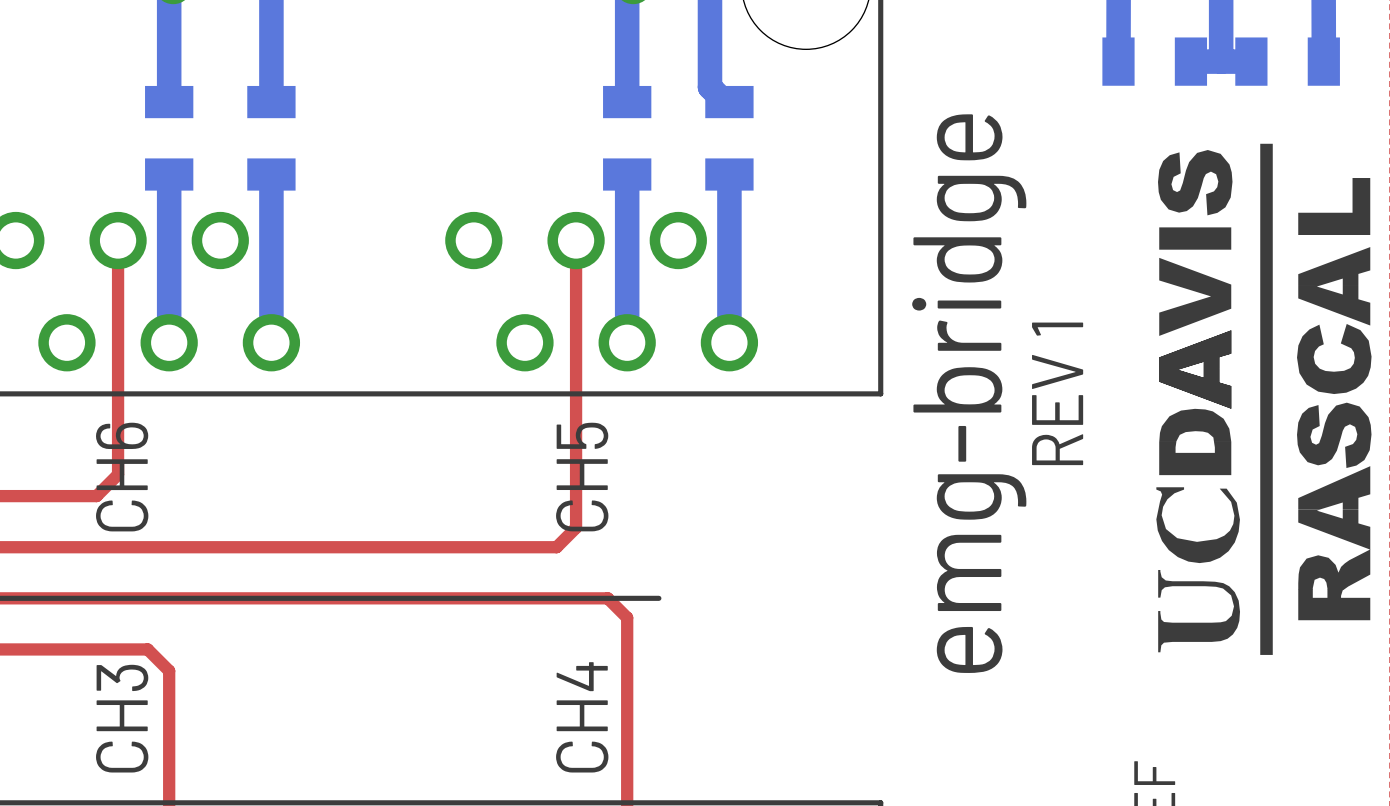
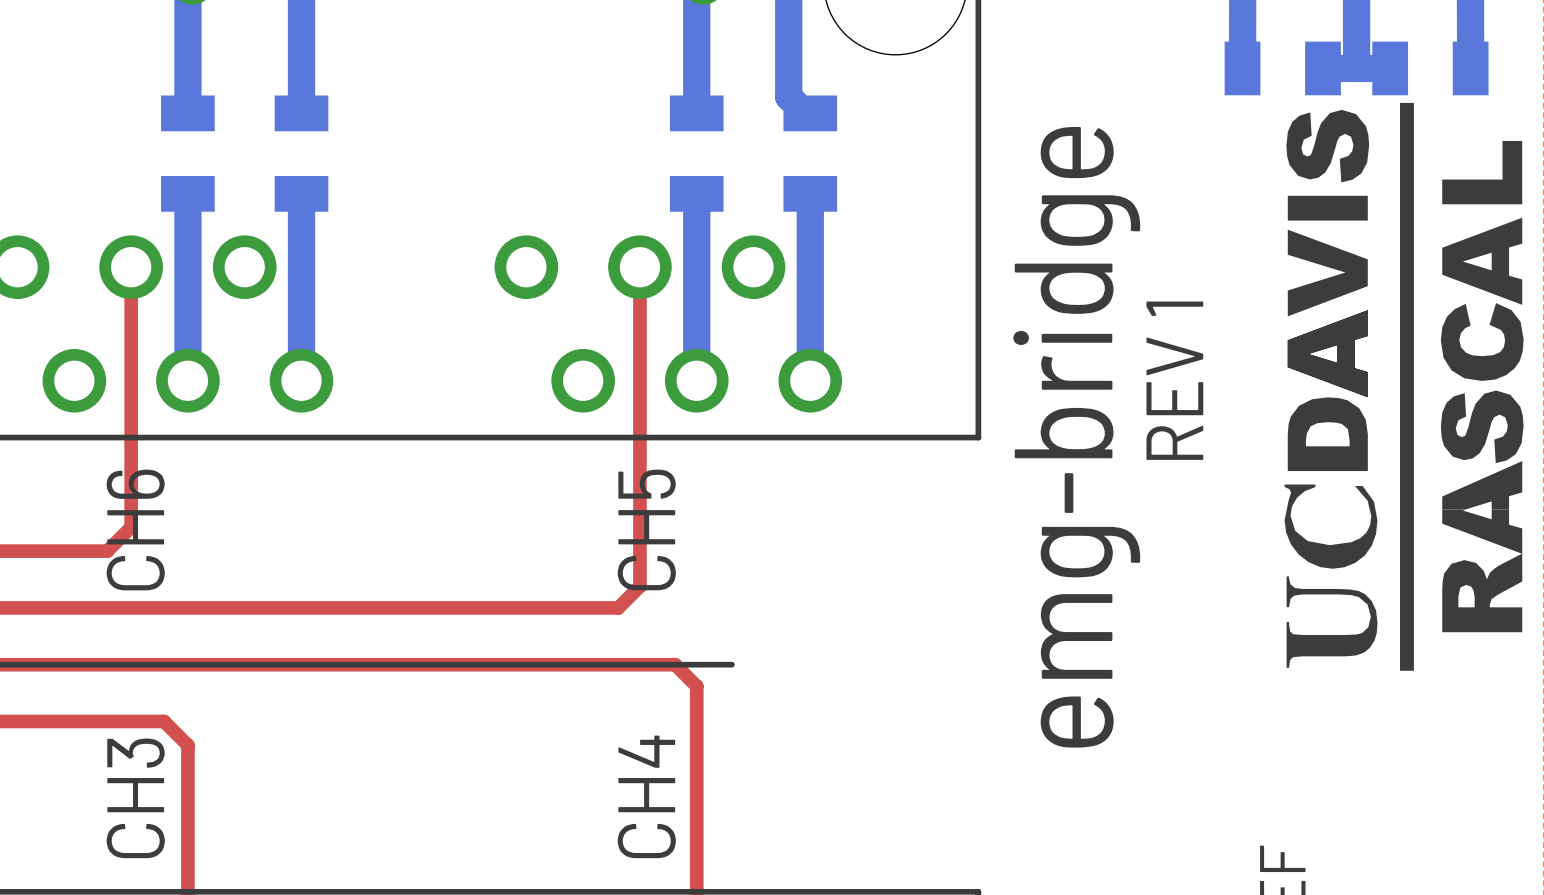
text position: REV 1 (1057, 393) -> REV 1 (1174, 380)
drawing position: (1263, 399) -> (1404, 386)

